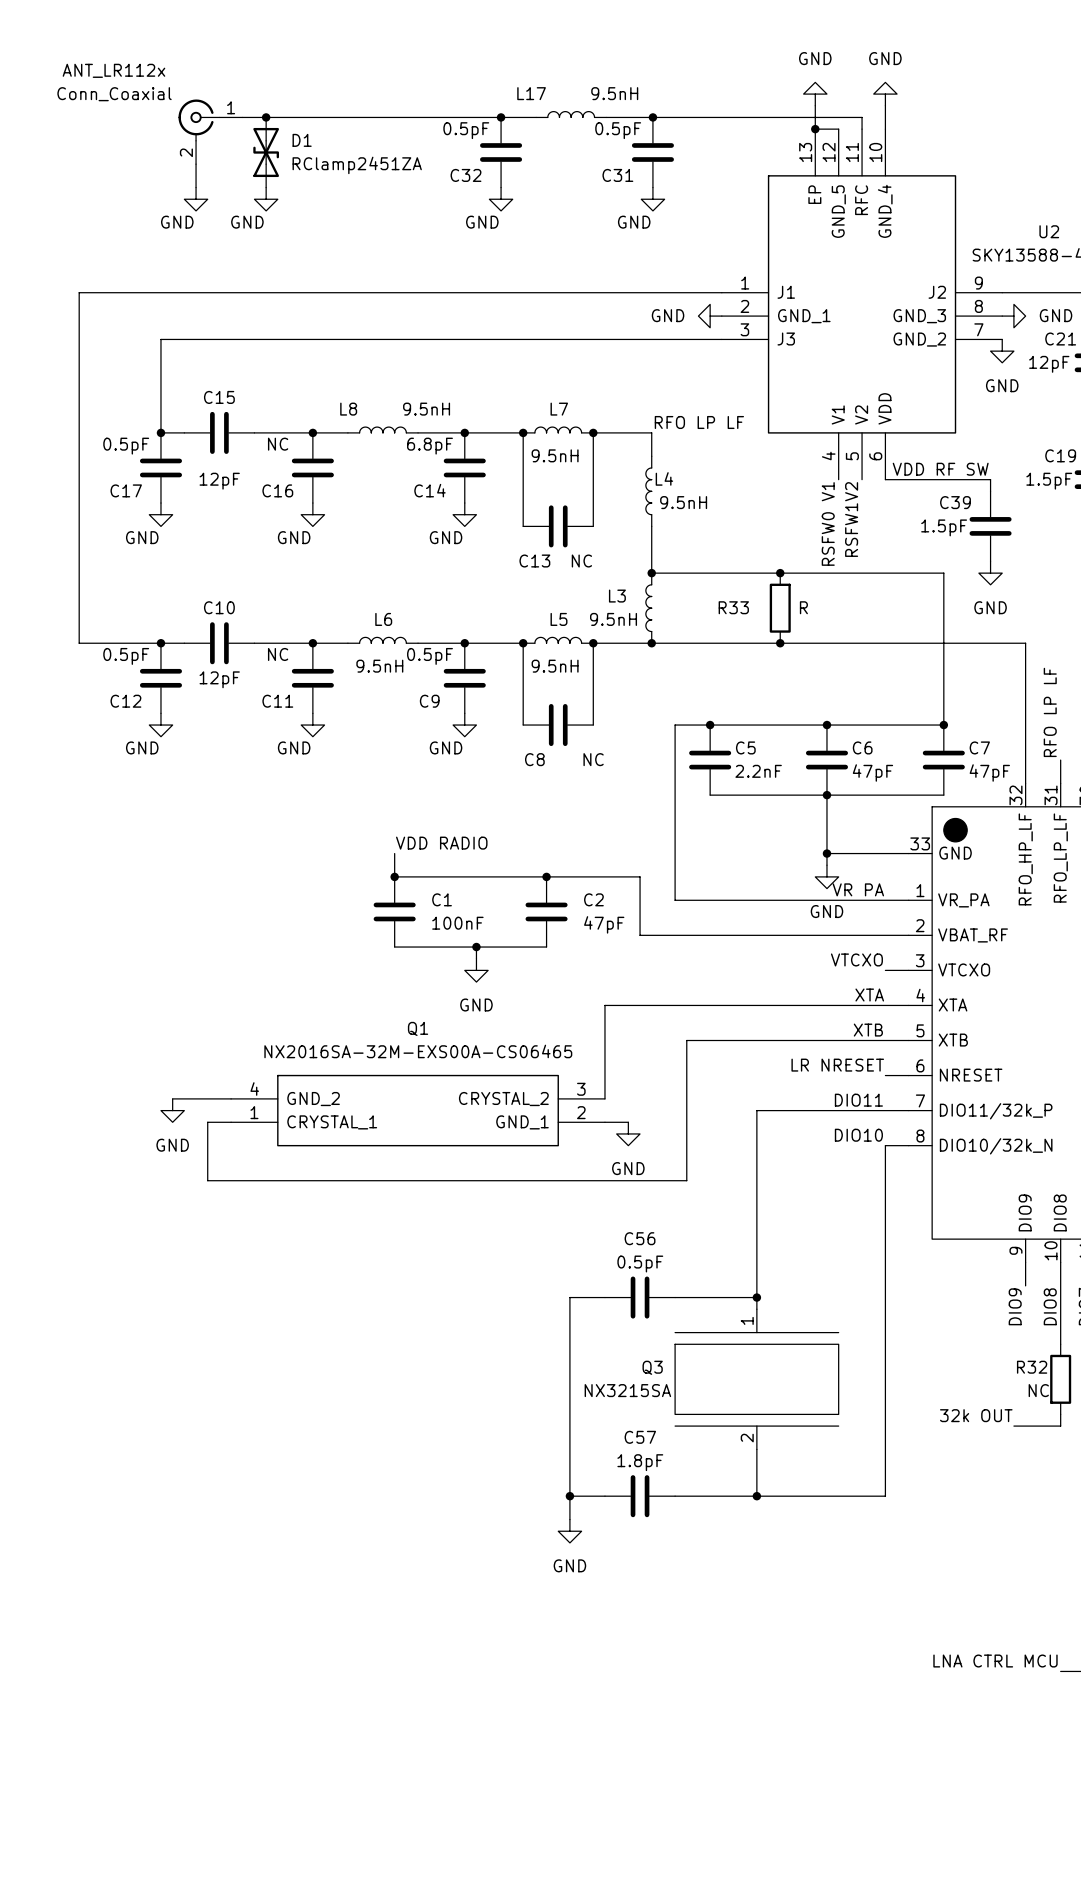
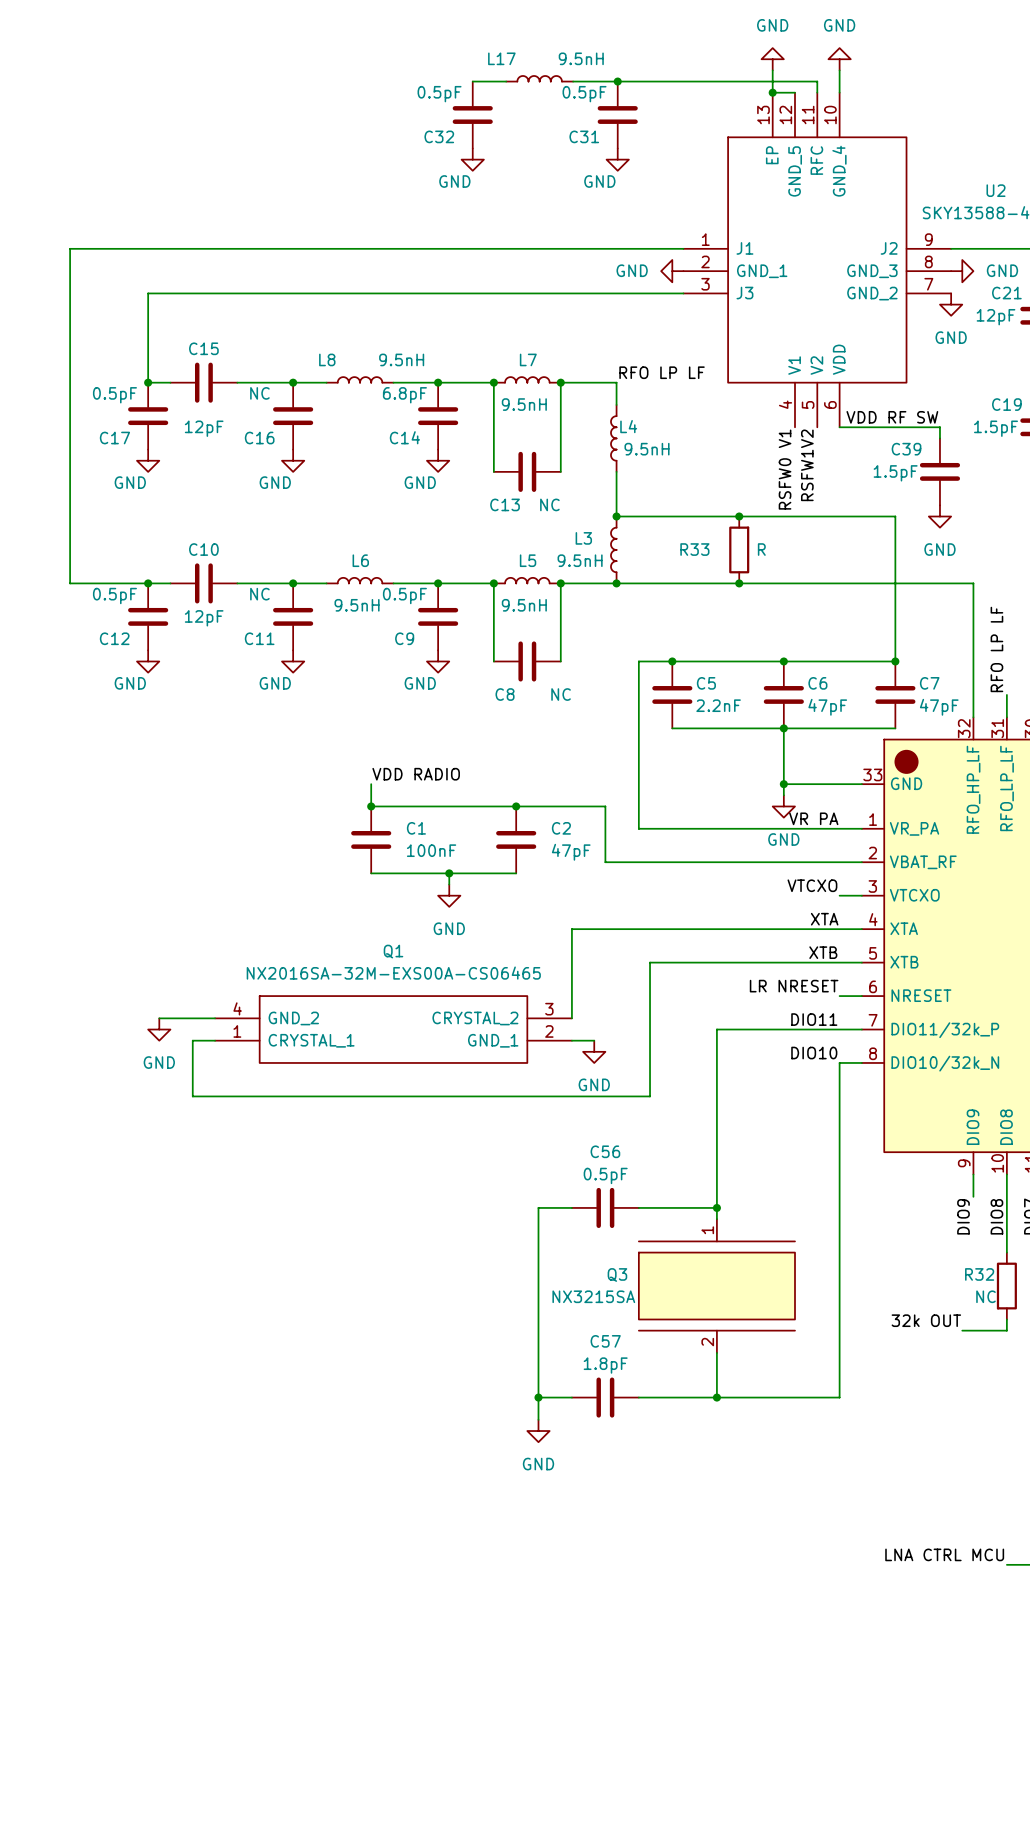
wire: (242, 117) (501, 117) -> none
junction: (266, 117) -> none
junction: (501, 117) -> none
ANT_LR112x: Conn_Coaxial (210, 131) -> none
D1: RClamp2451ZA (266, 152) -> none
wire: (196, 164) (196, 187) -> none
power symbol: GND (196, 199) -> none
power symbol: GND (266, 199) -> none

